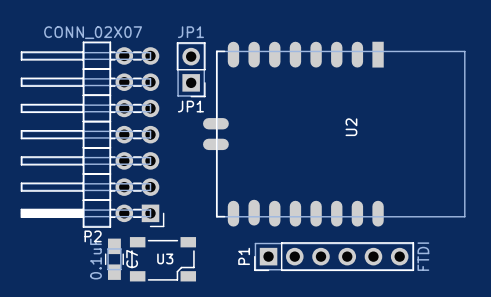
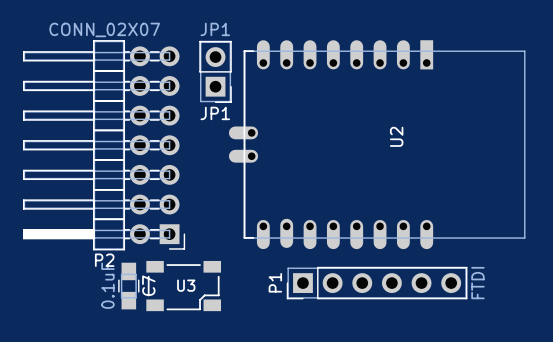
U2 footprint: [203, 41, 466, 227] -> [228, 40, 526, 250]

